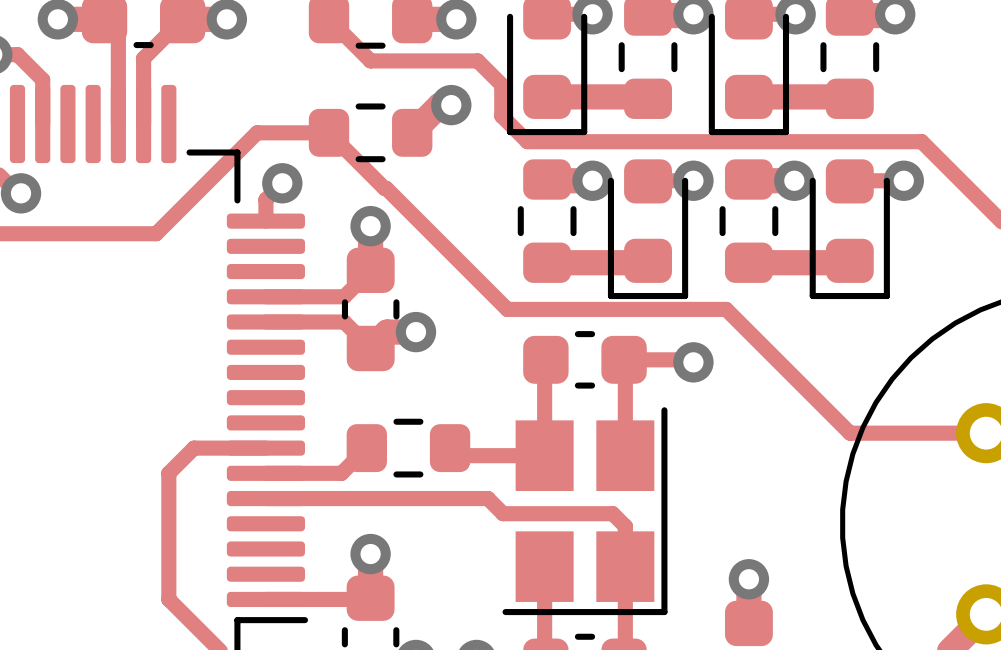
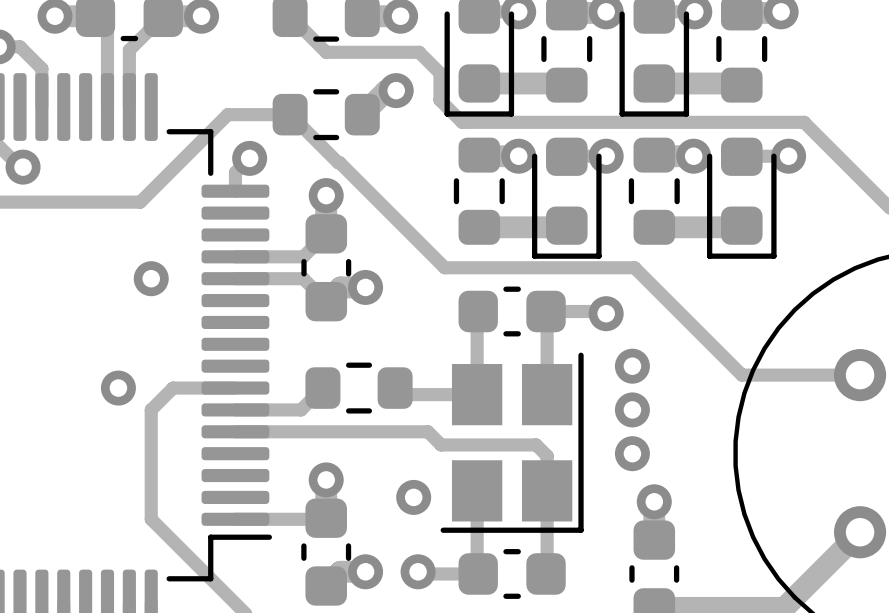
via: none -> (151, 278)
via: none -> (632, 366)
via: none -> (118, 388)
via: none -> (632, 409)
via: none -> (632, 453)
via: none -> (413, 497)

